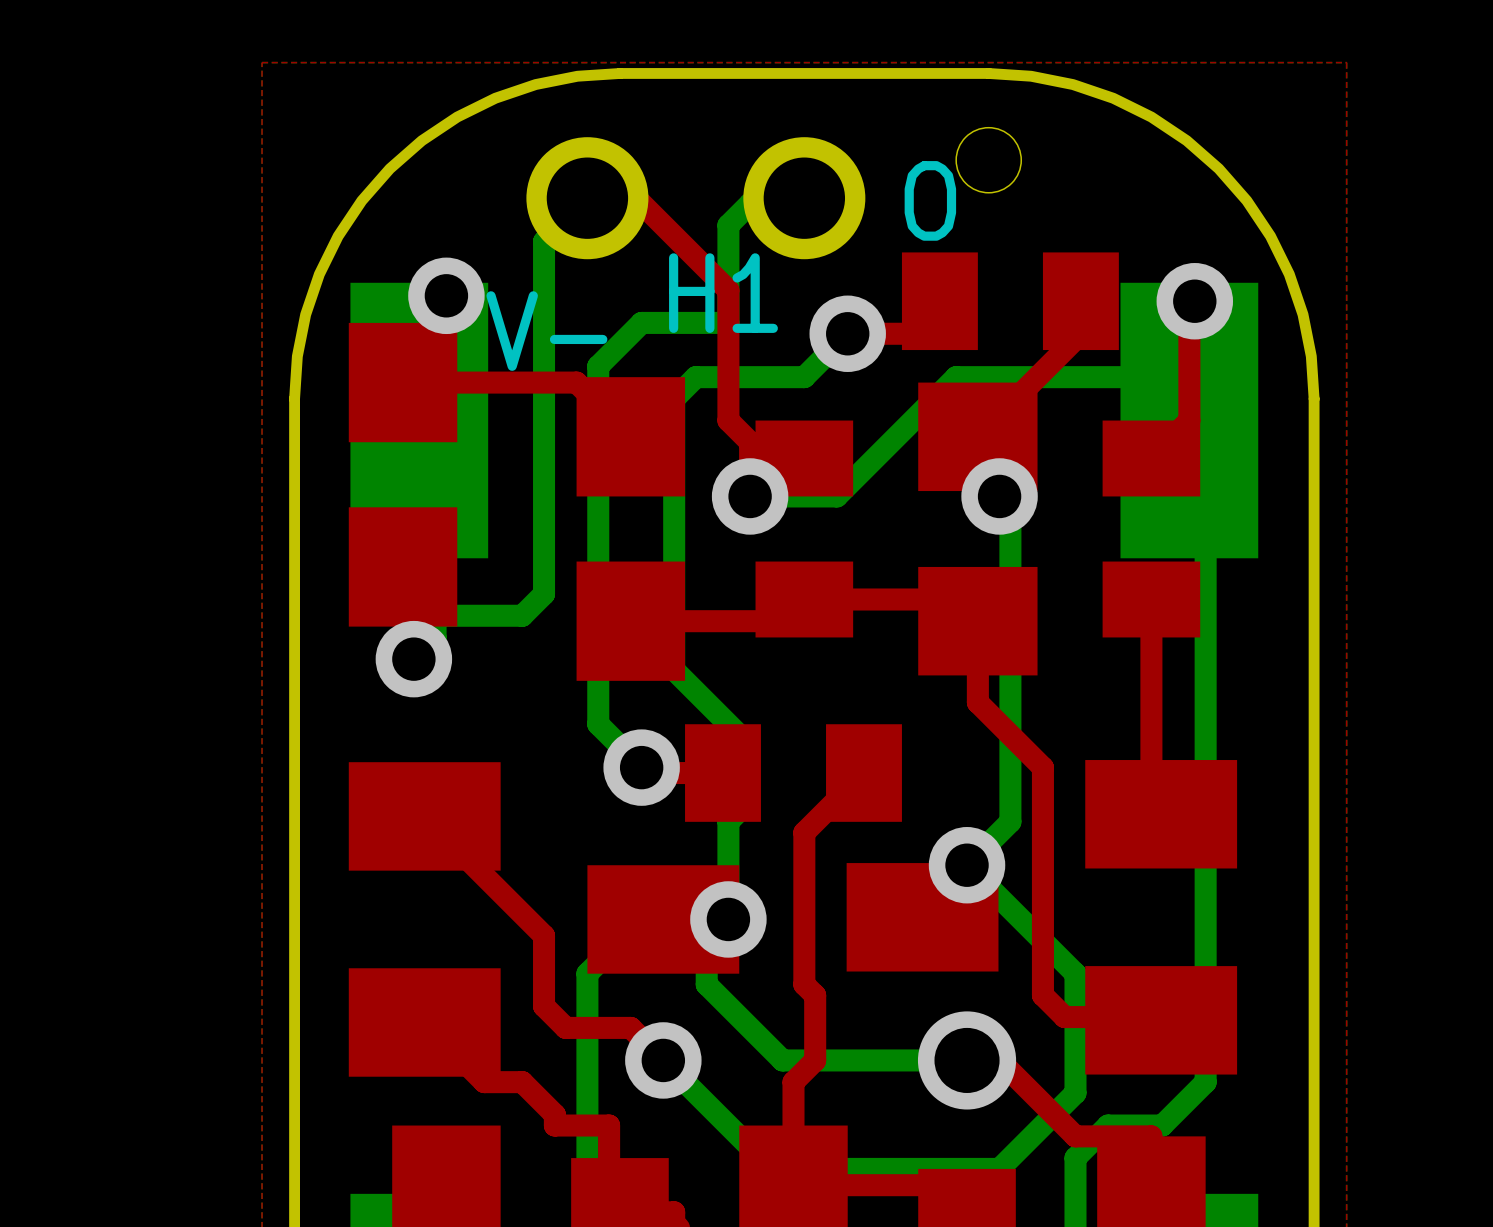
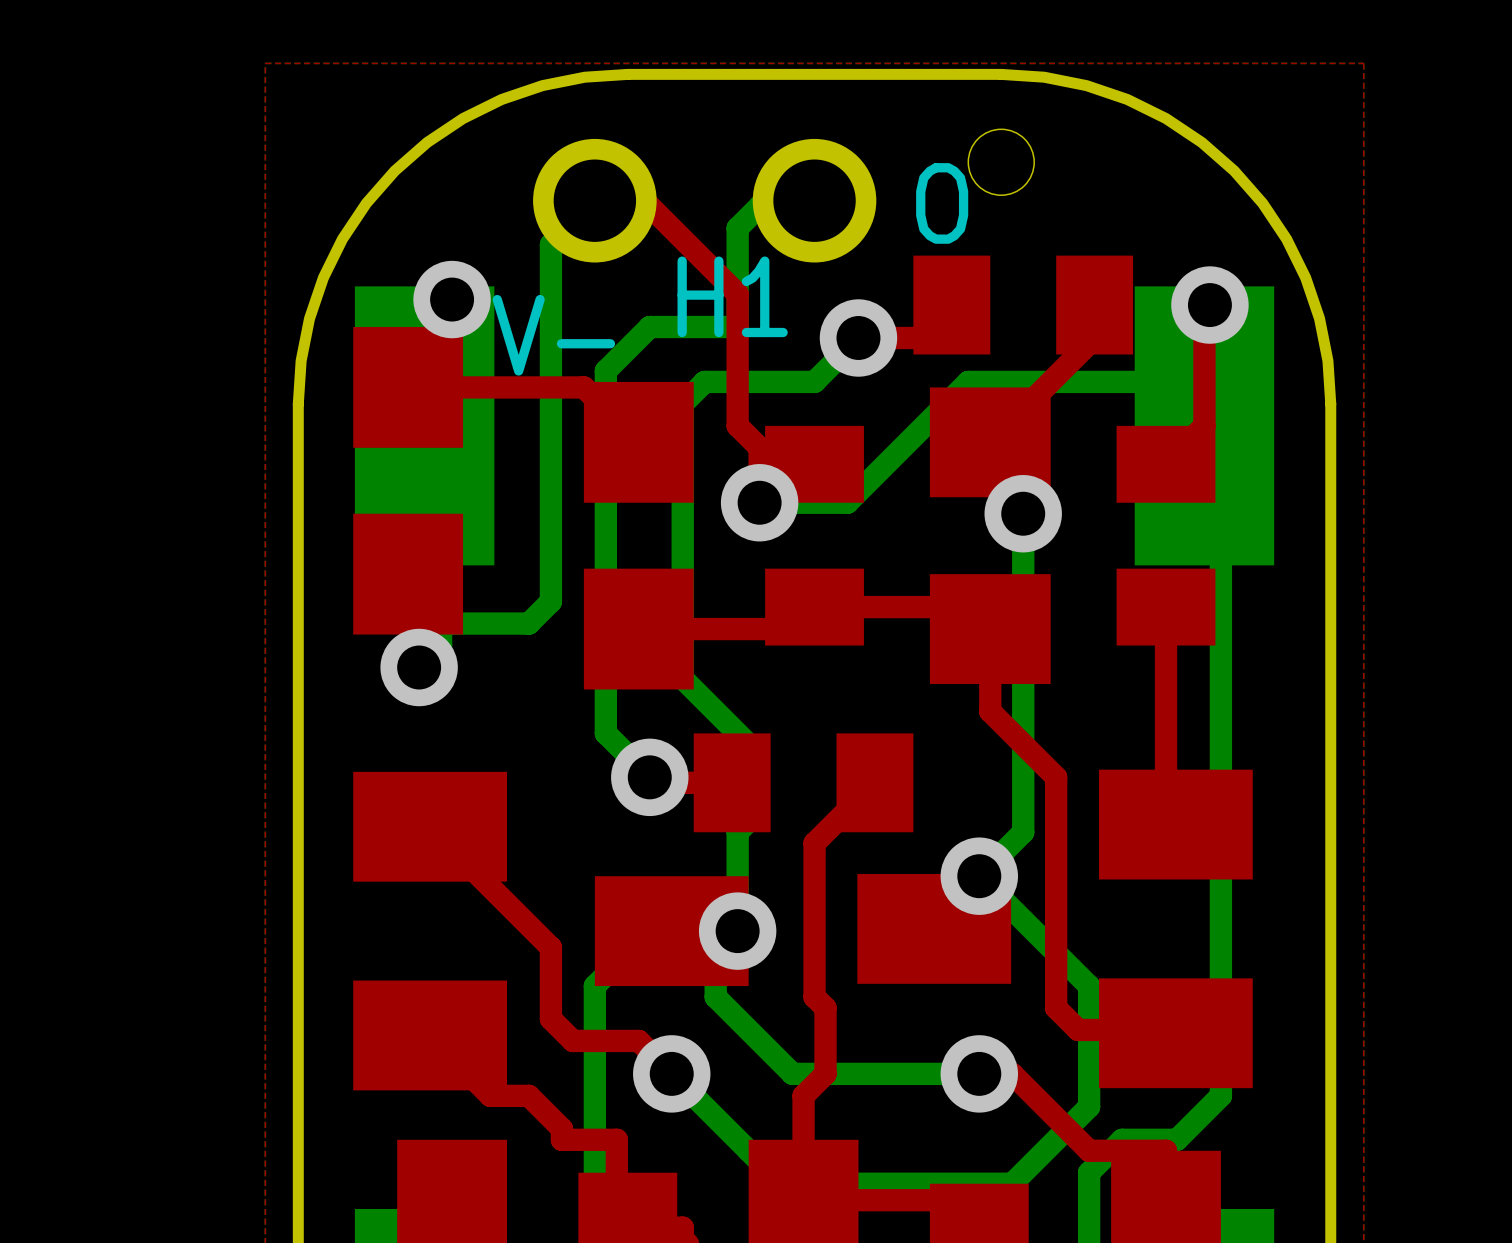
via position: (999, 496) -> (1023, 513)
via size: [917, 1011, 1017, 1110] -> [940, 1035, 1018, 1113]

